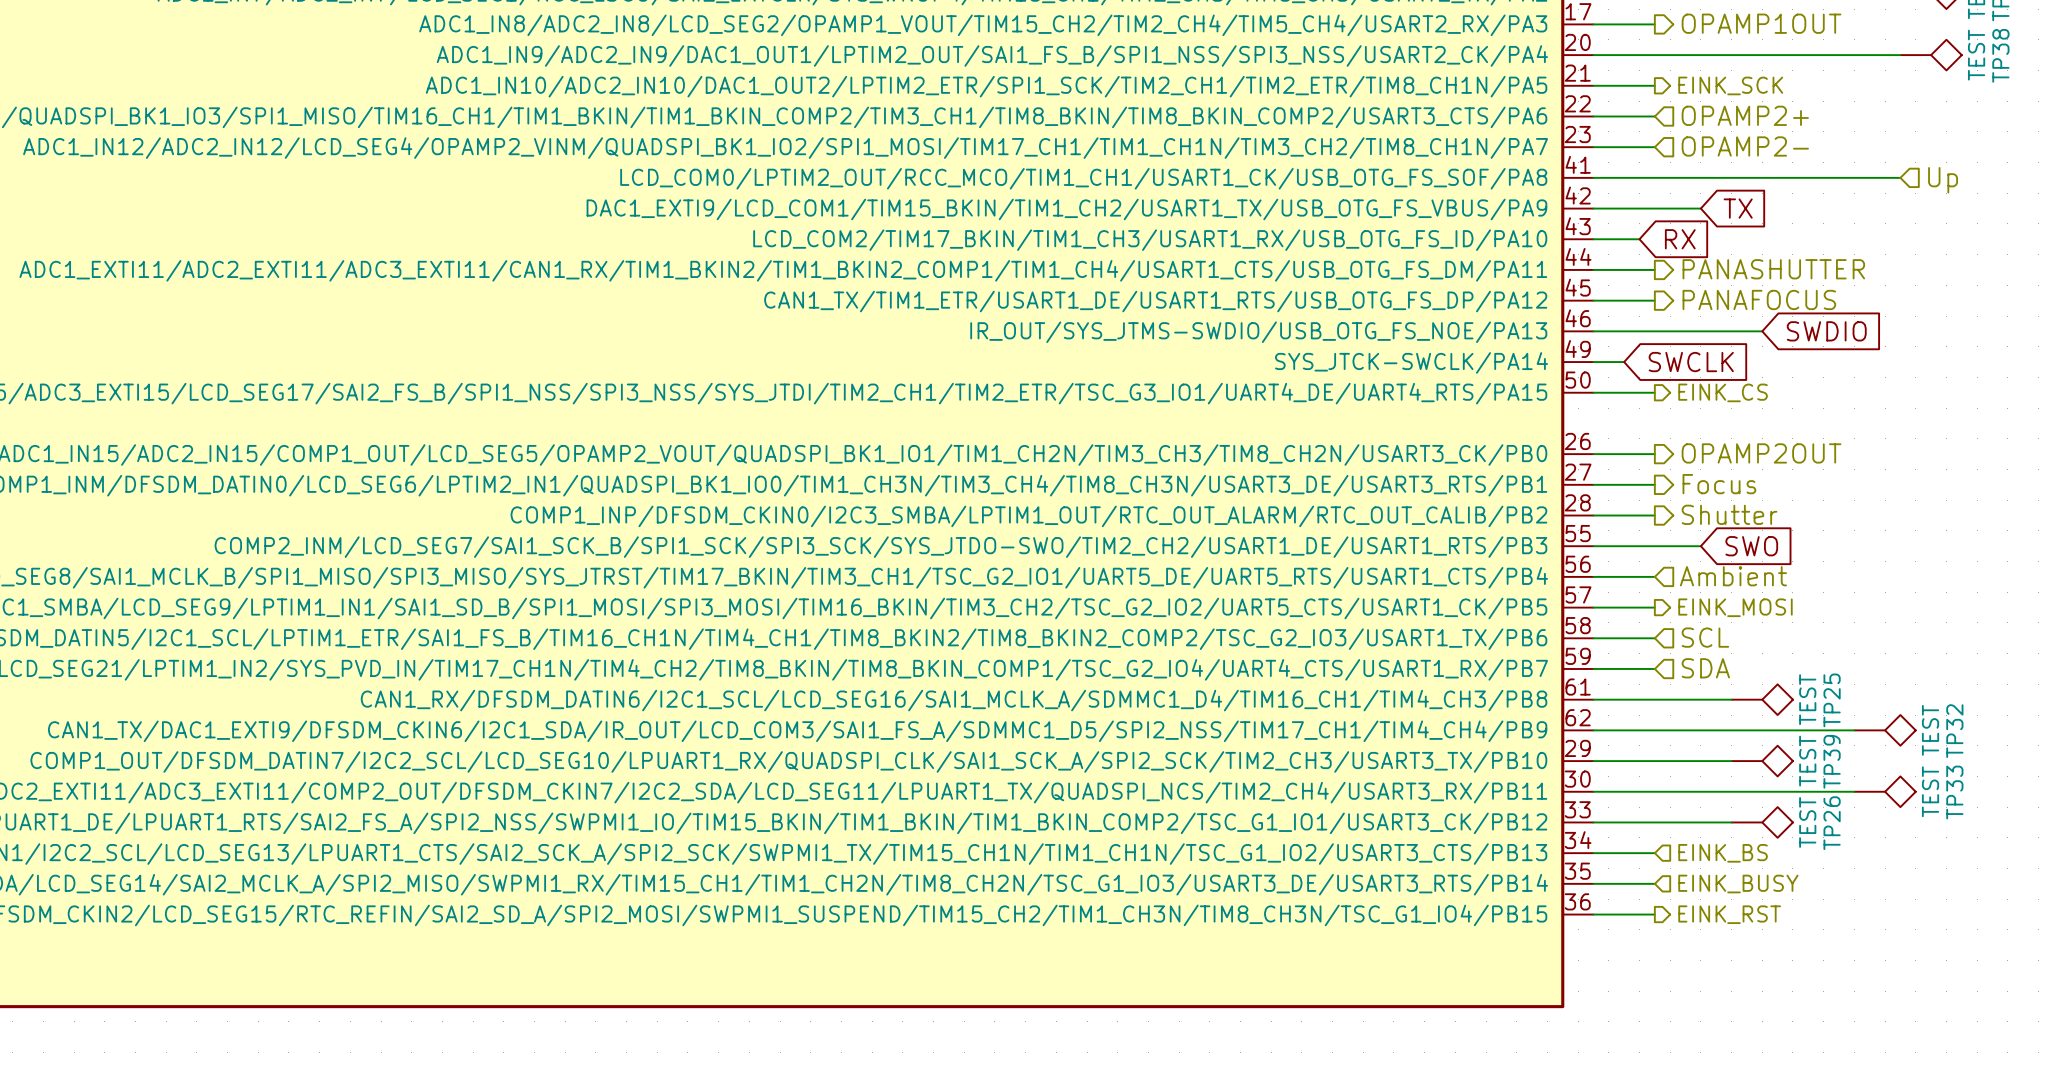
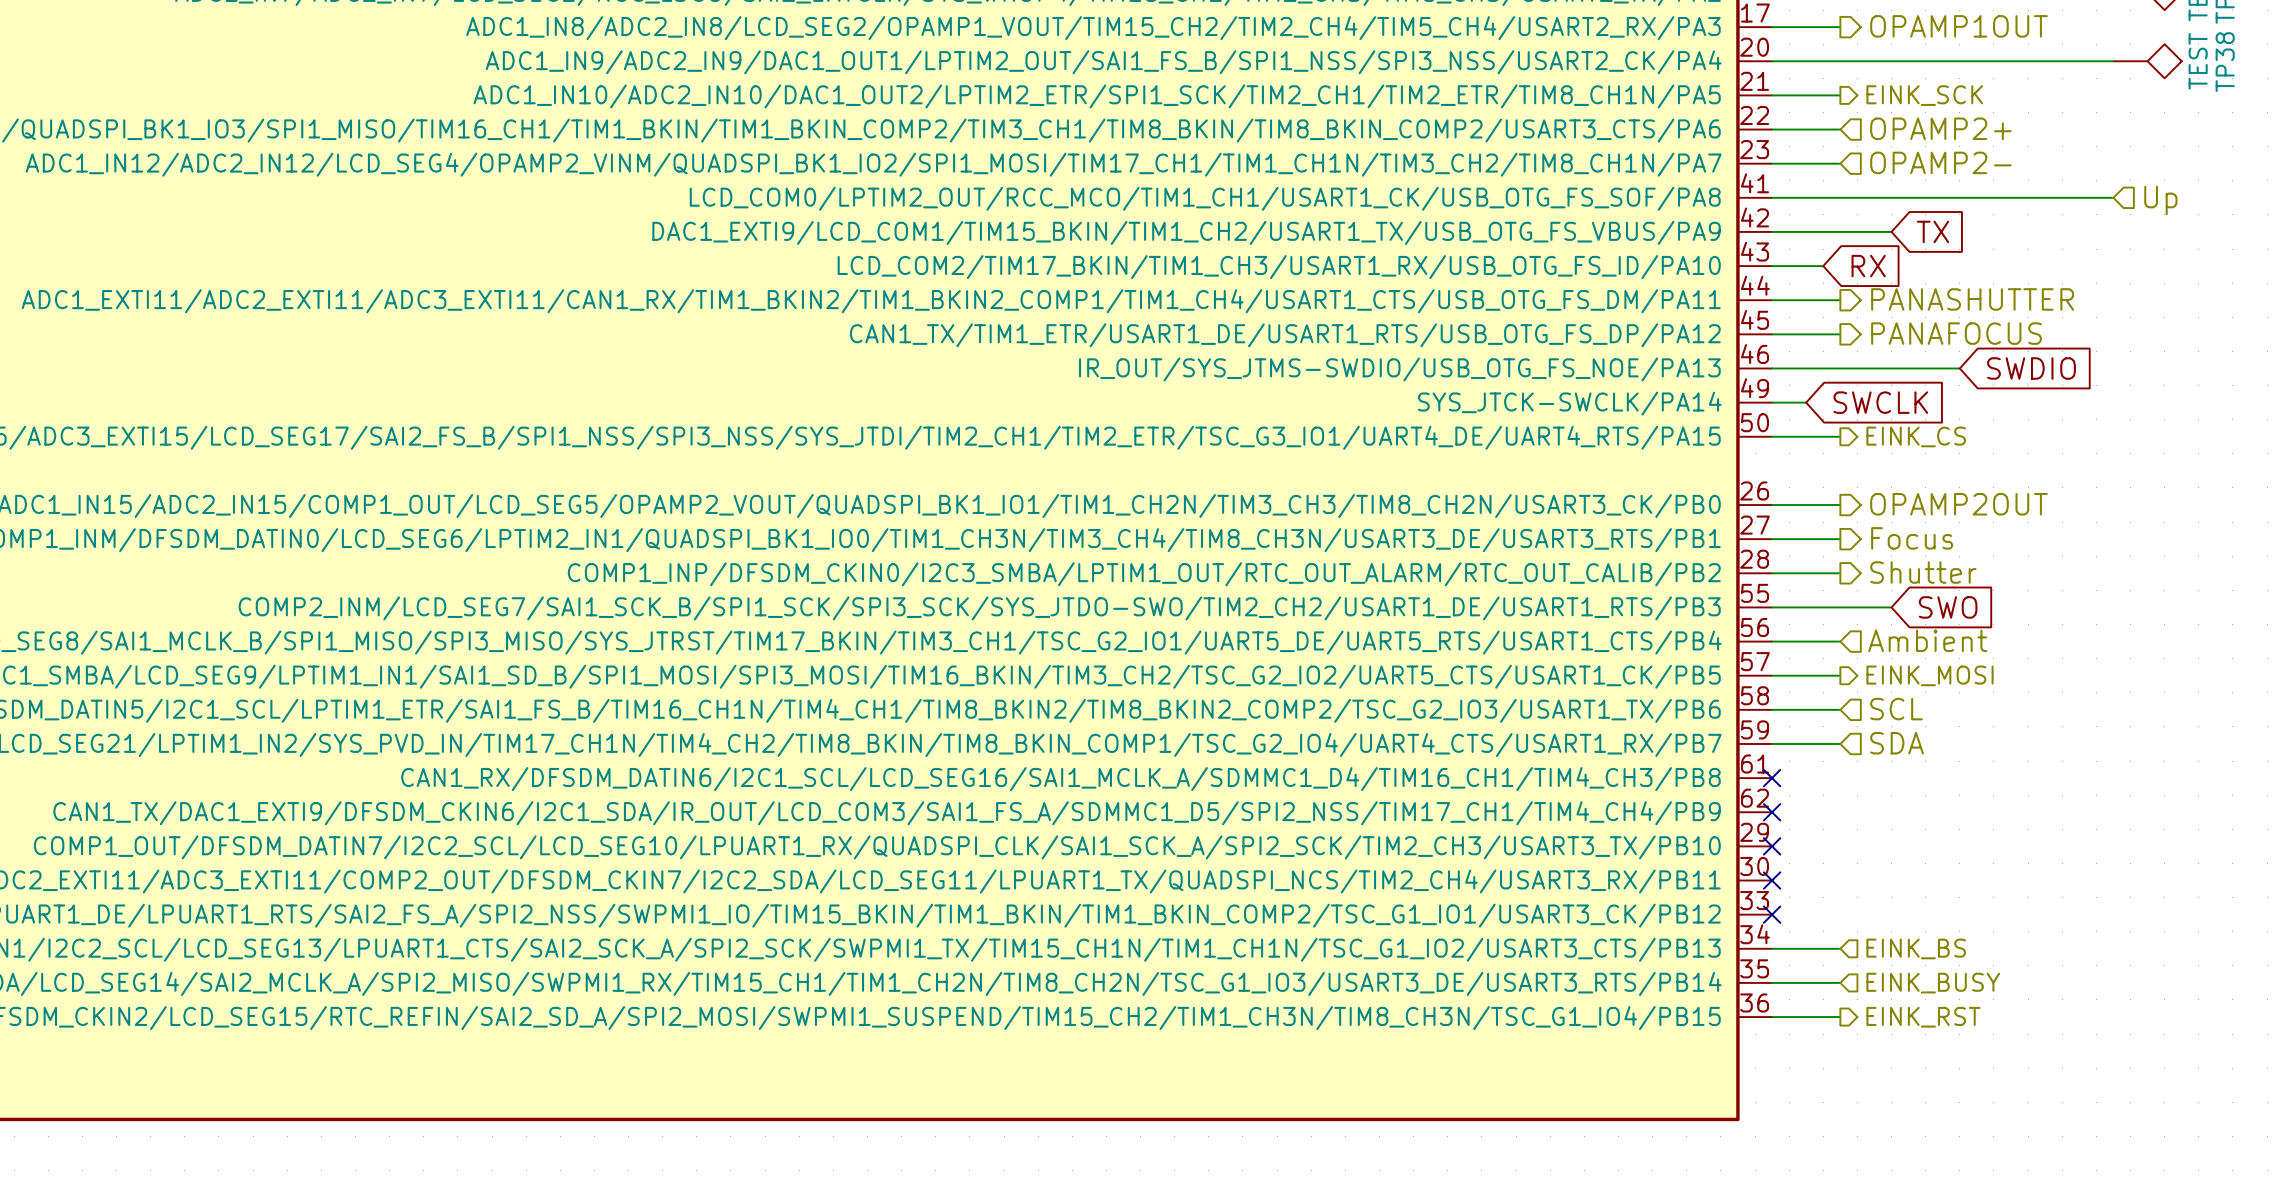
wire: (1593, 699) (1731, 699) -> none
no-connect mark: none -> (1772, 778)
TP25: TEST (1762, 699) -> none
wire: (1593, 730) (1854, 730) -> none
no-connect mark: none -> (1772, 812)
TP32: TEST (1885, 730) -> none
wire: (1593, 761) (1731, 761) -> none
no-connect mark: none -> (1772, 846)
TP39: TEST (1762, 761) -> none
wire: (1593, 791) (1854, 791) -> none
no-connect mark: none -> (1772, 880)
TP33: TEST (1885, 791) -> none
wire: (1593, 822) (1731, 822) -> none
no-connect mark: none -> (1772, 914)
TP26: TEST (1762, 822) -> none

